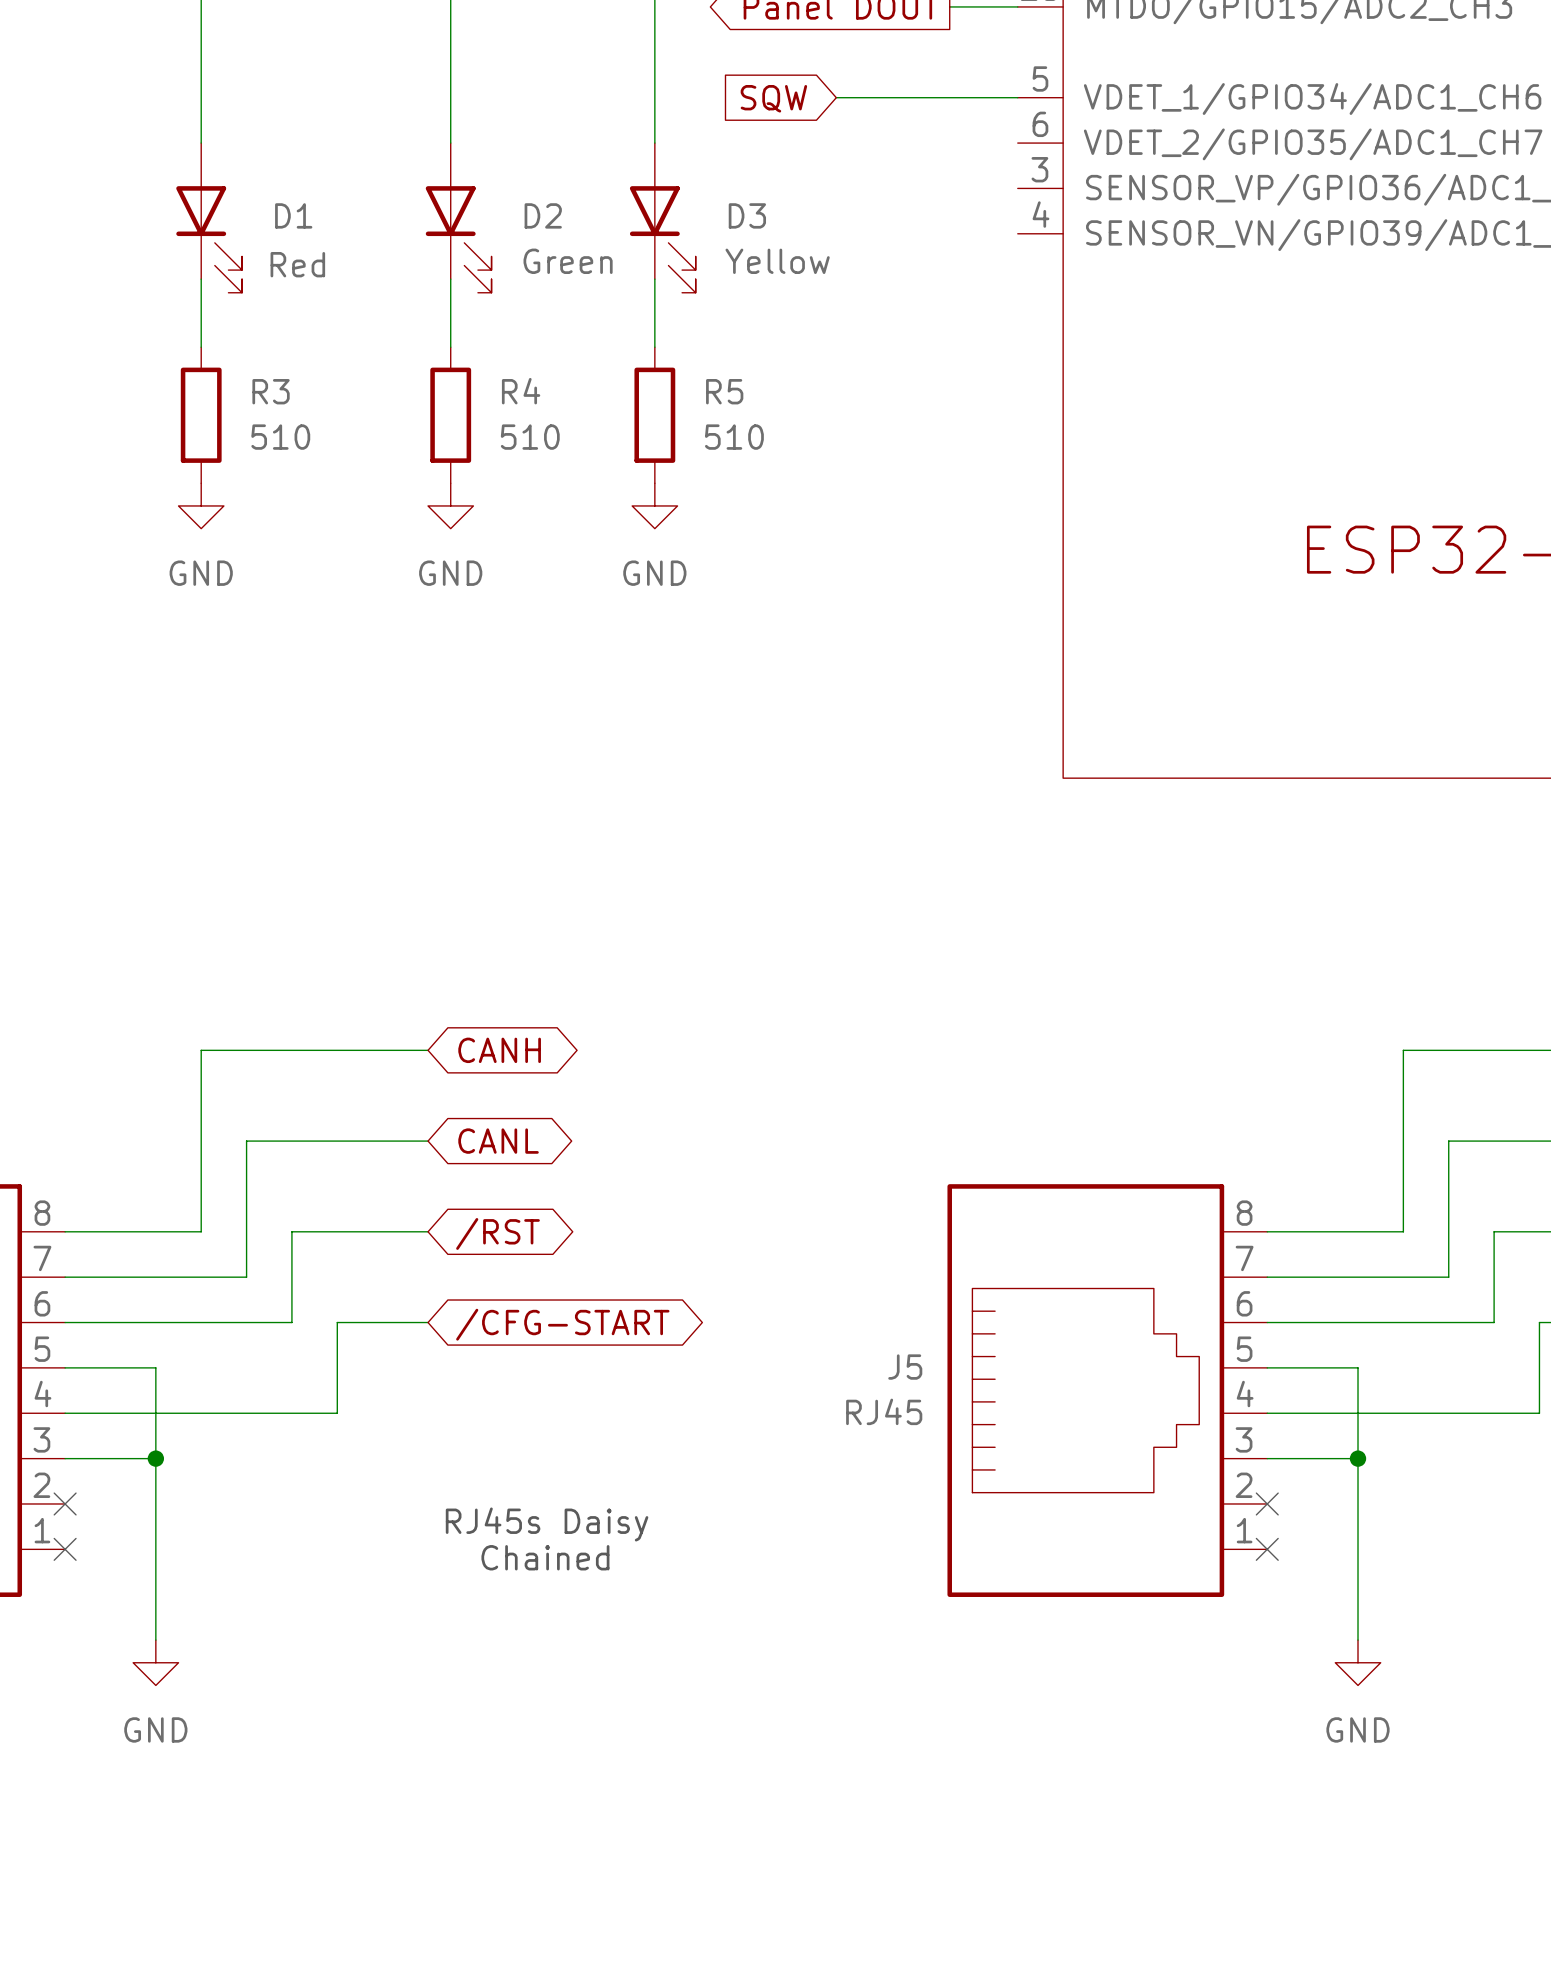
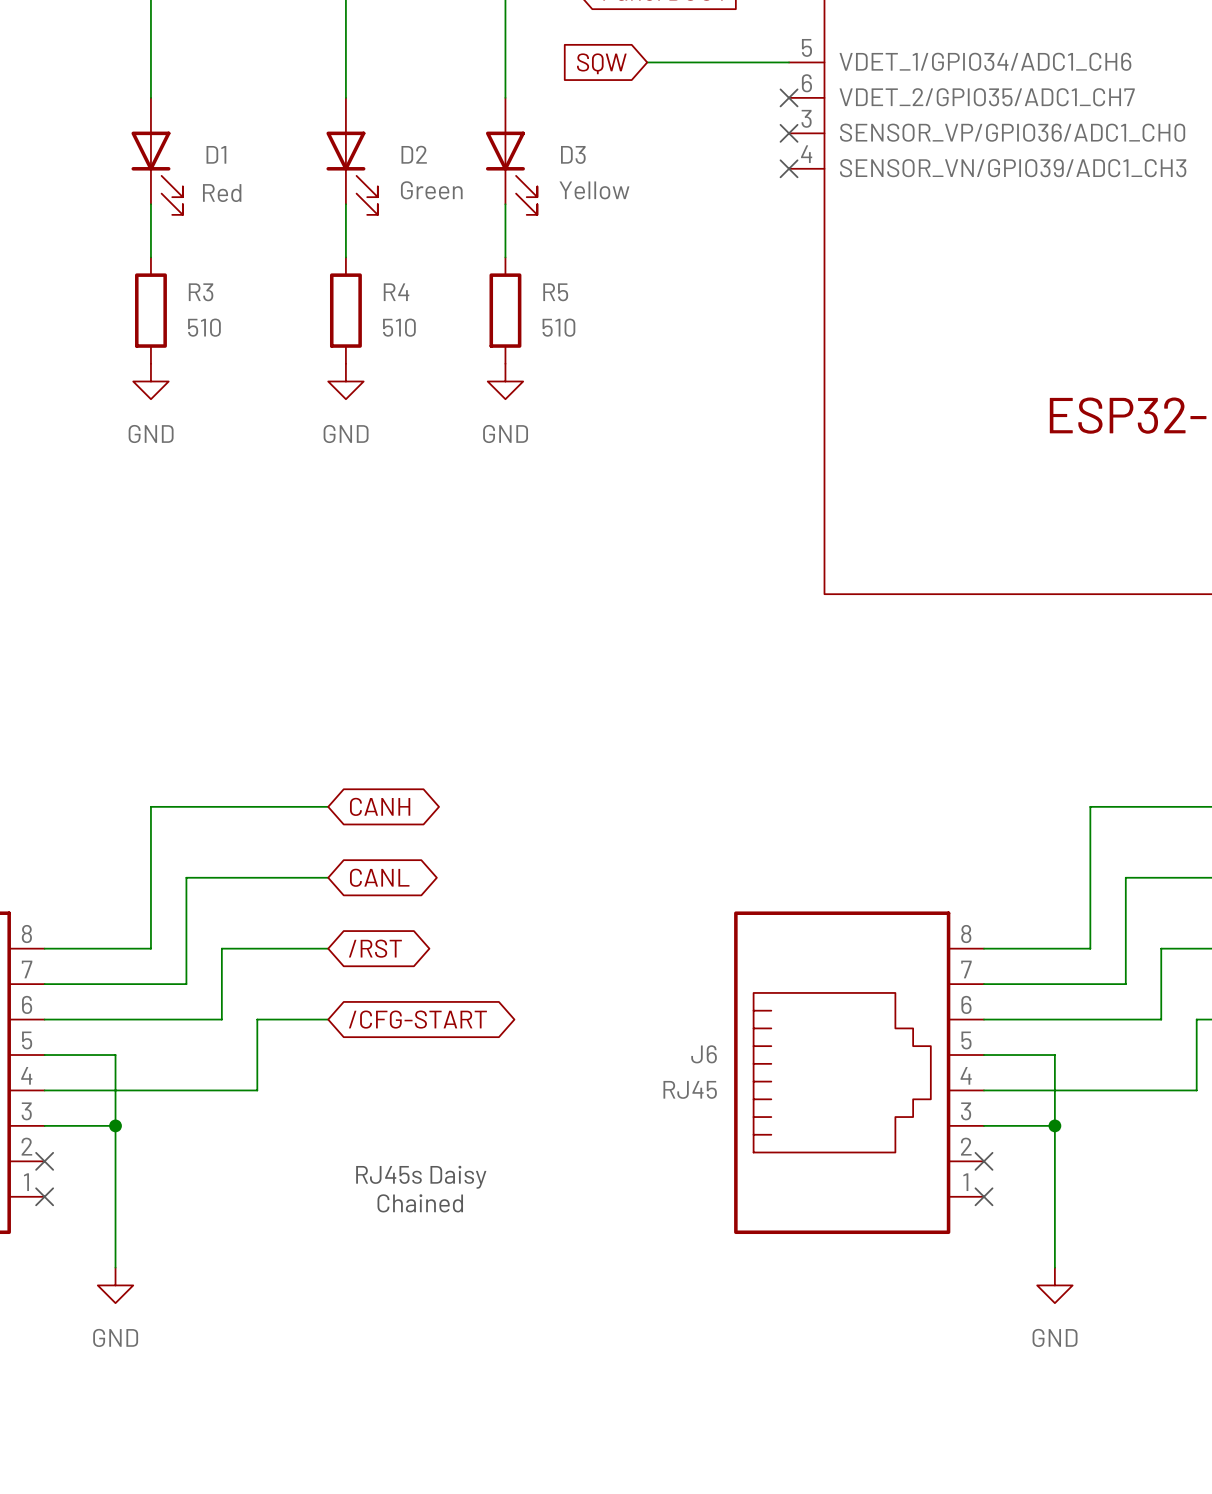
no-connect mark: none -> (789, 97)
no-connect mark: none -> (789, 133)
no-connect mark: none -> (789, 168)
J5 name: J5 (905, 1367) -> J6 (704, 1054)

